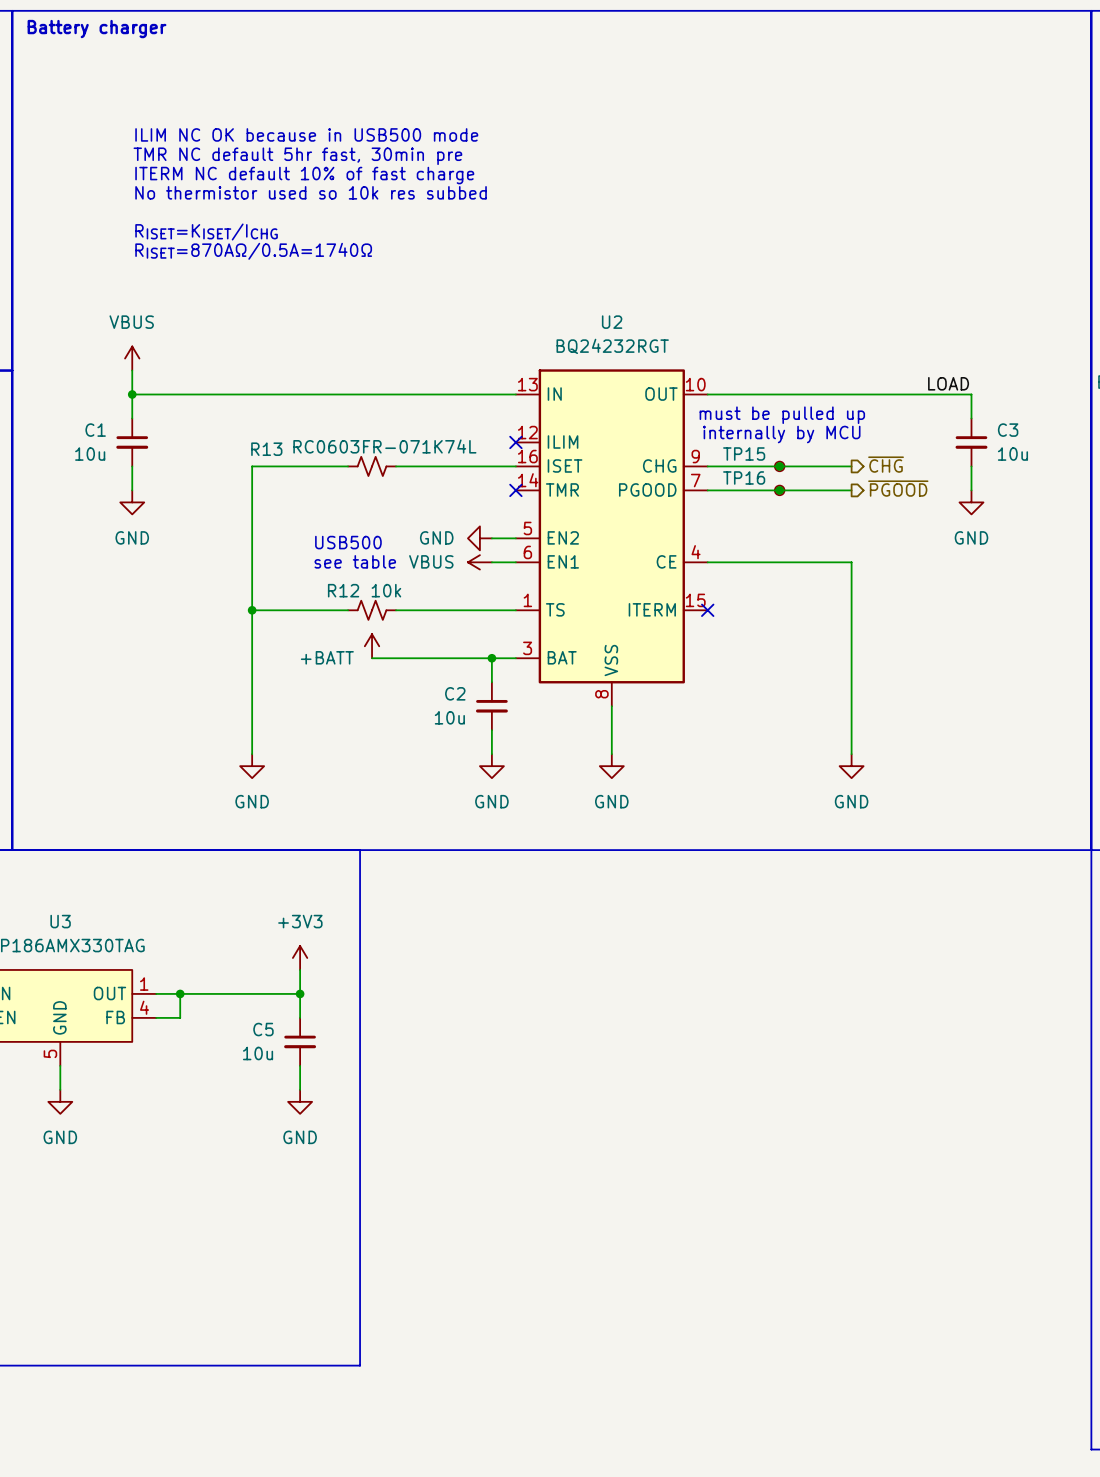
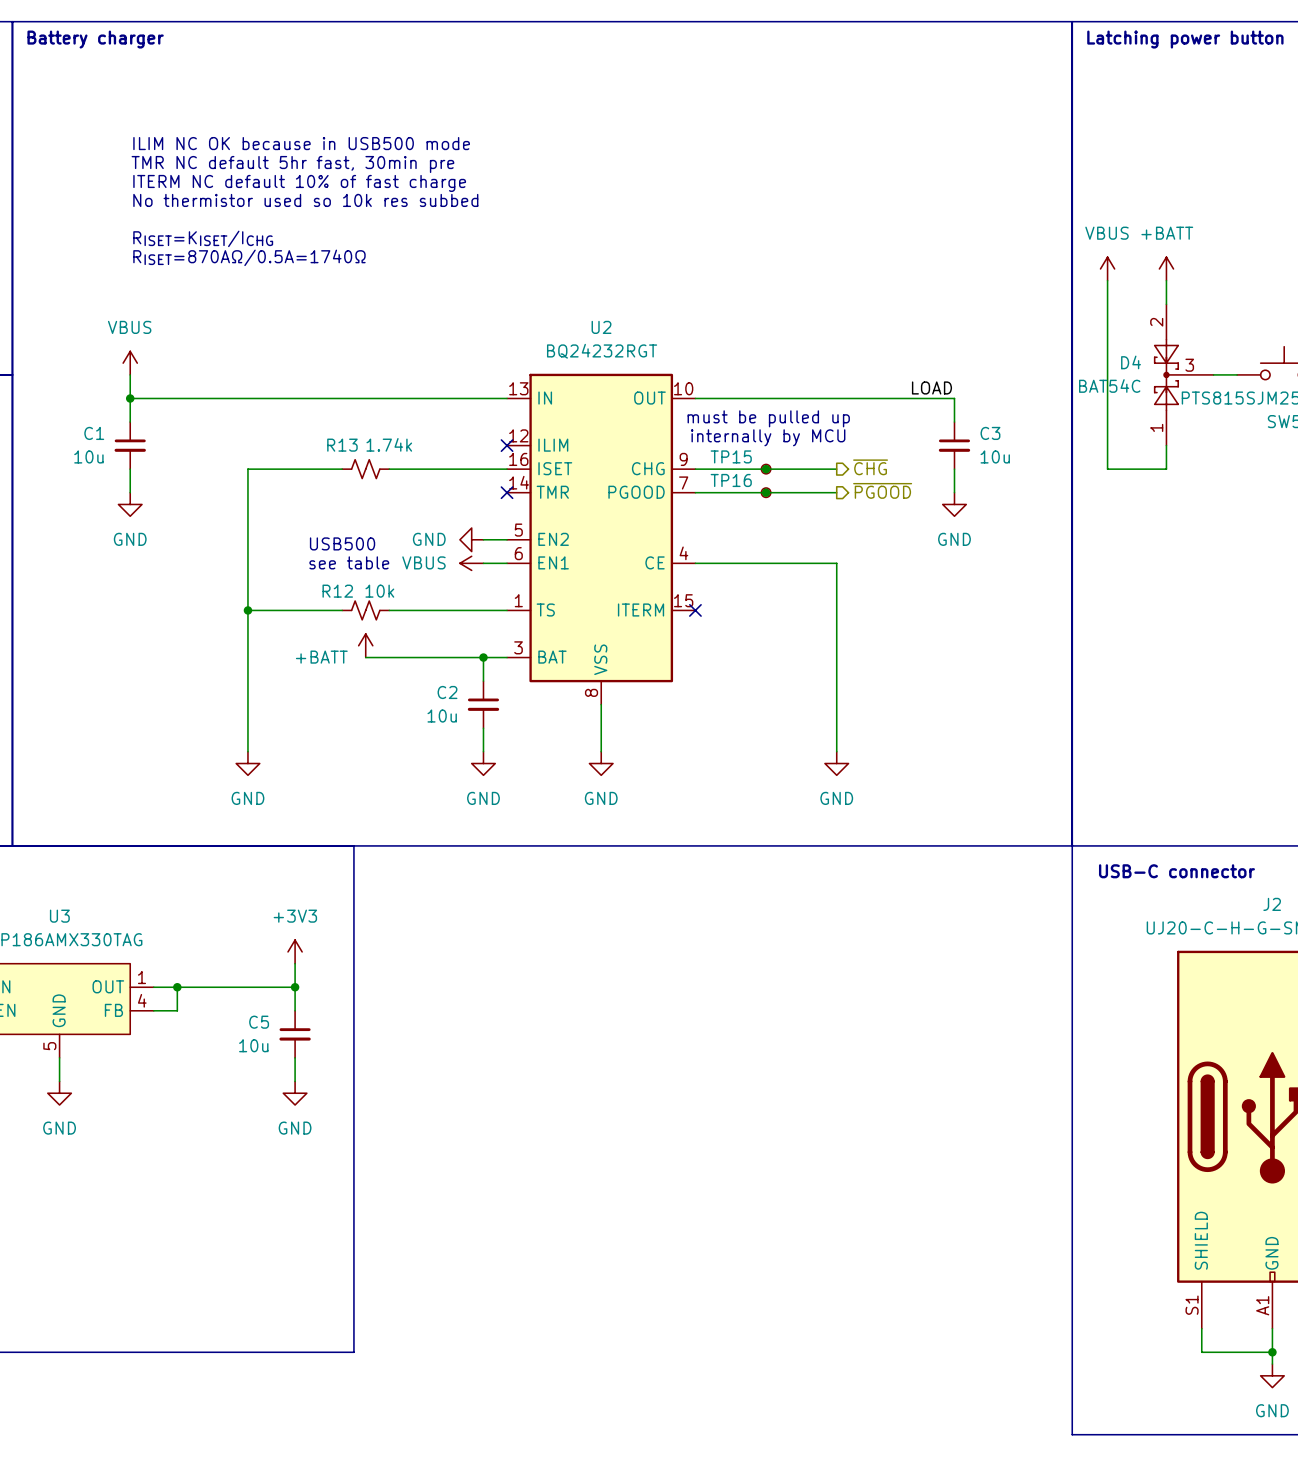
R13 value: RC0603FR-071K74L (384, 446) -> 1.74k (389, 444)
R13 name position: R13 (266, 449) -> R13 (342, 445)

